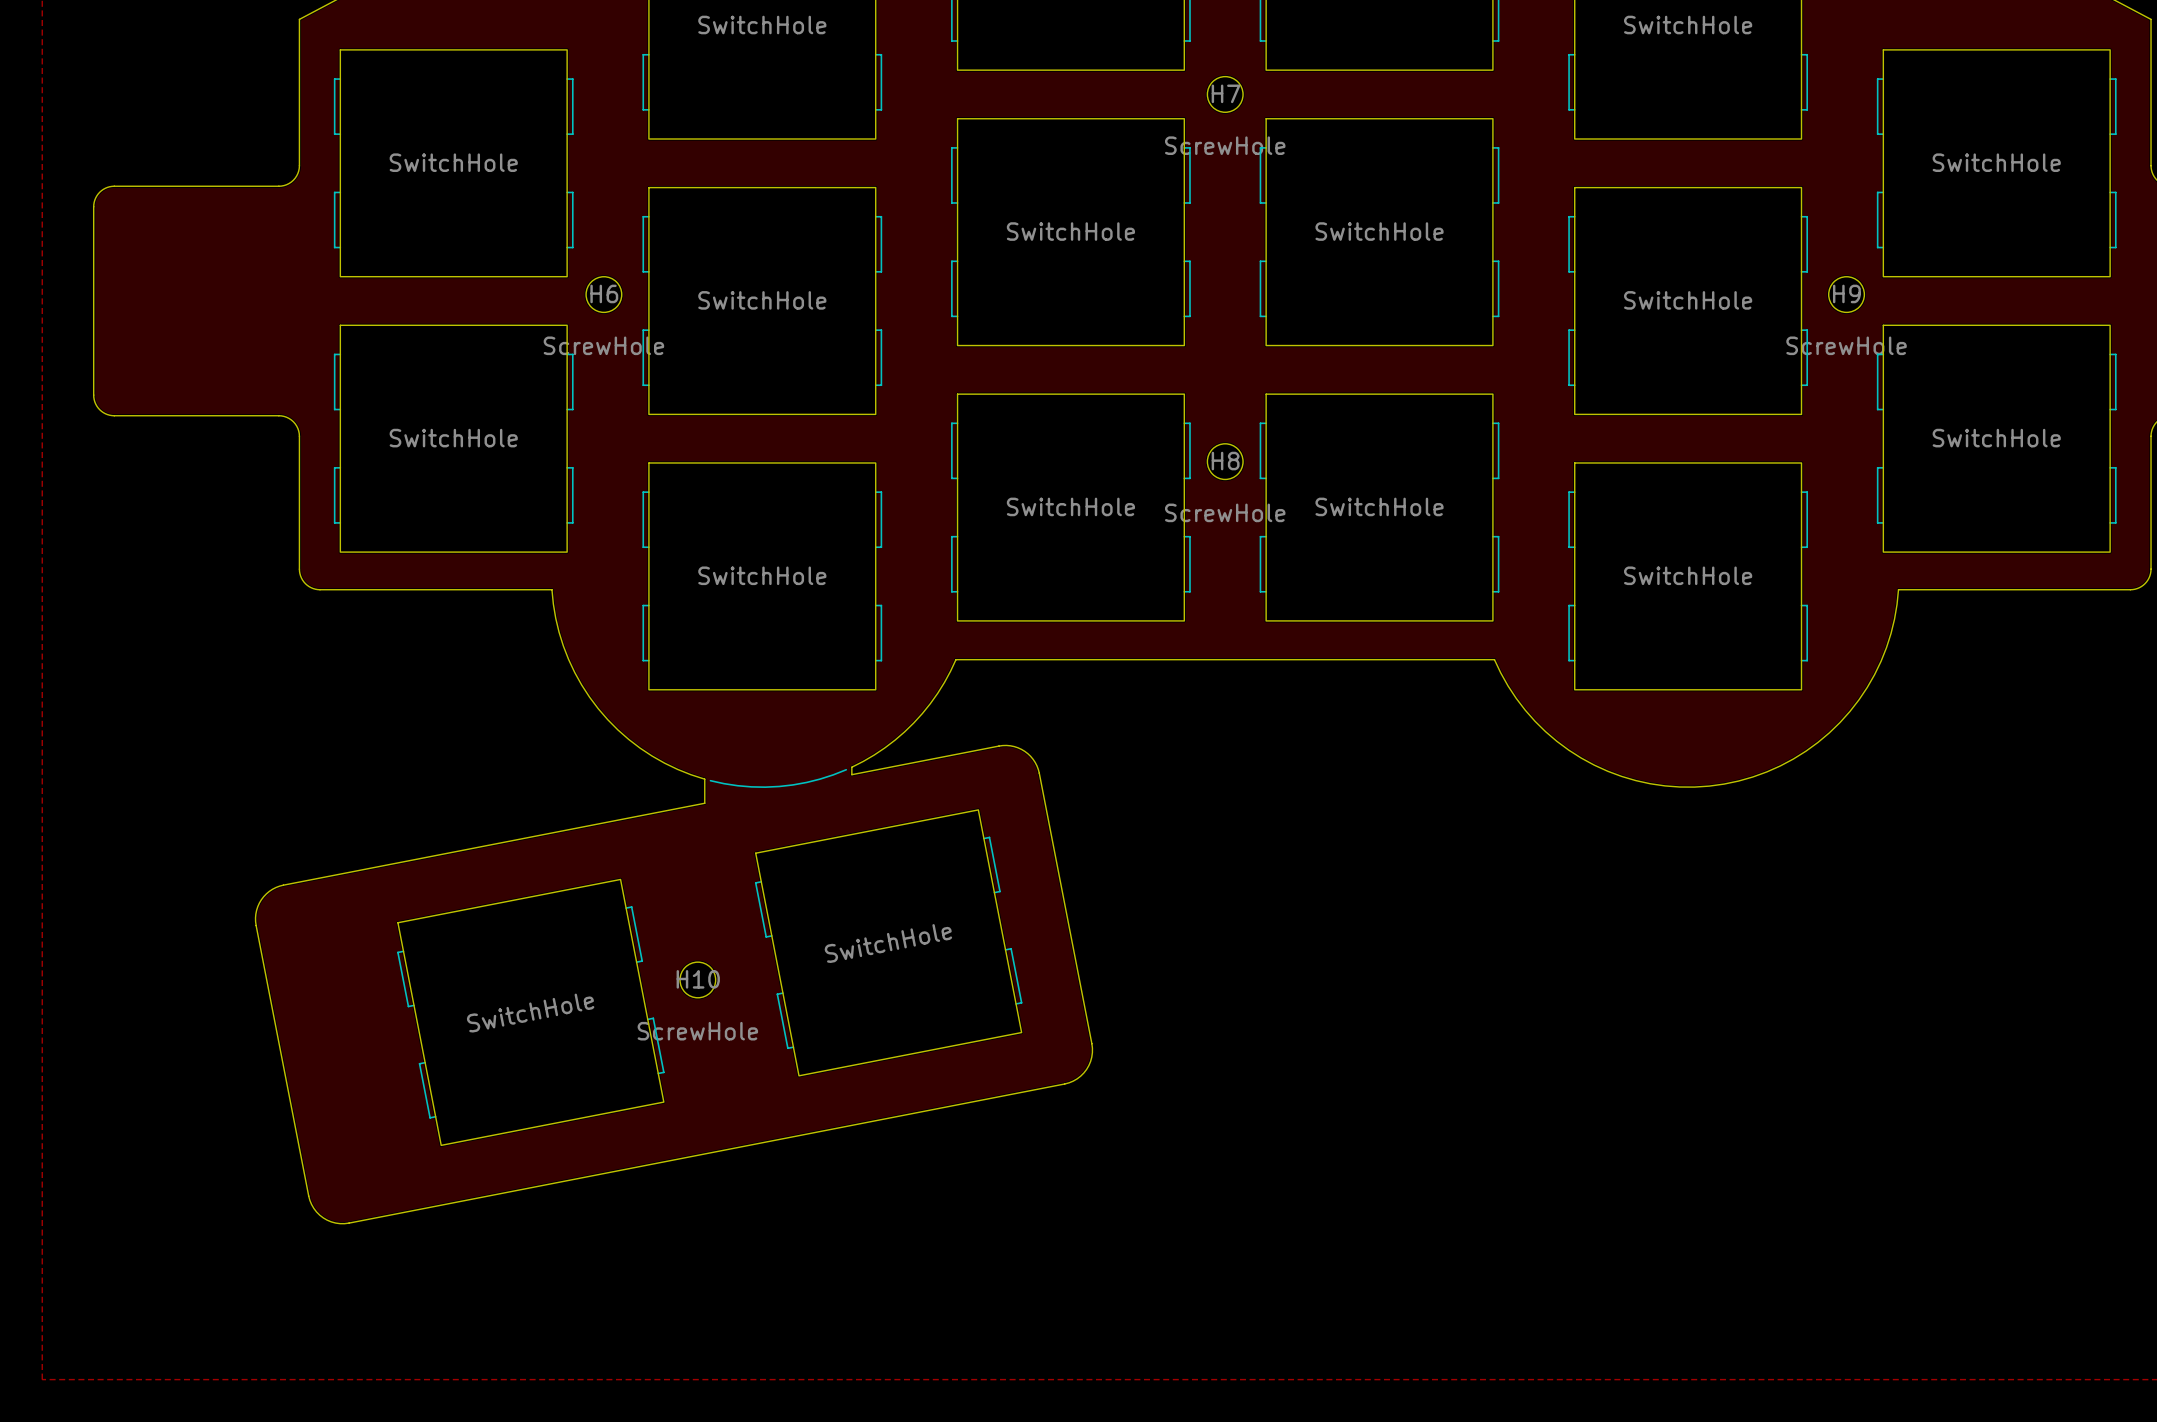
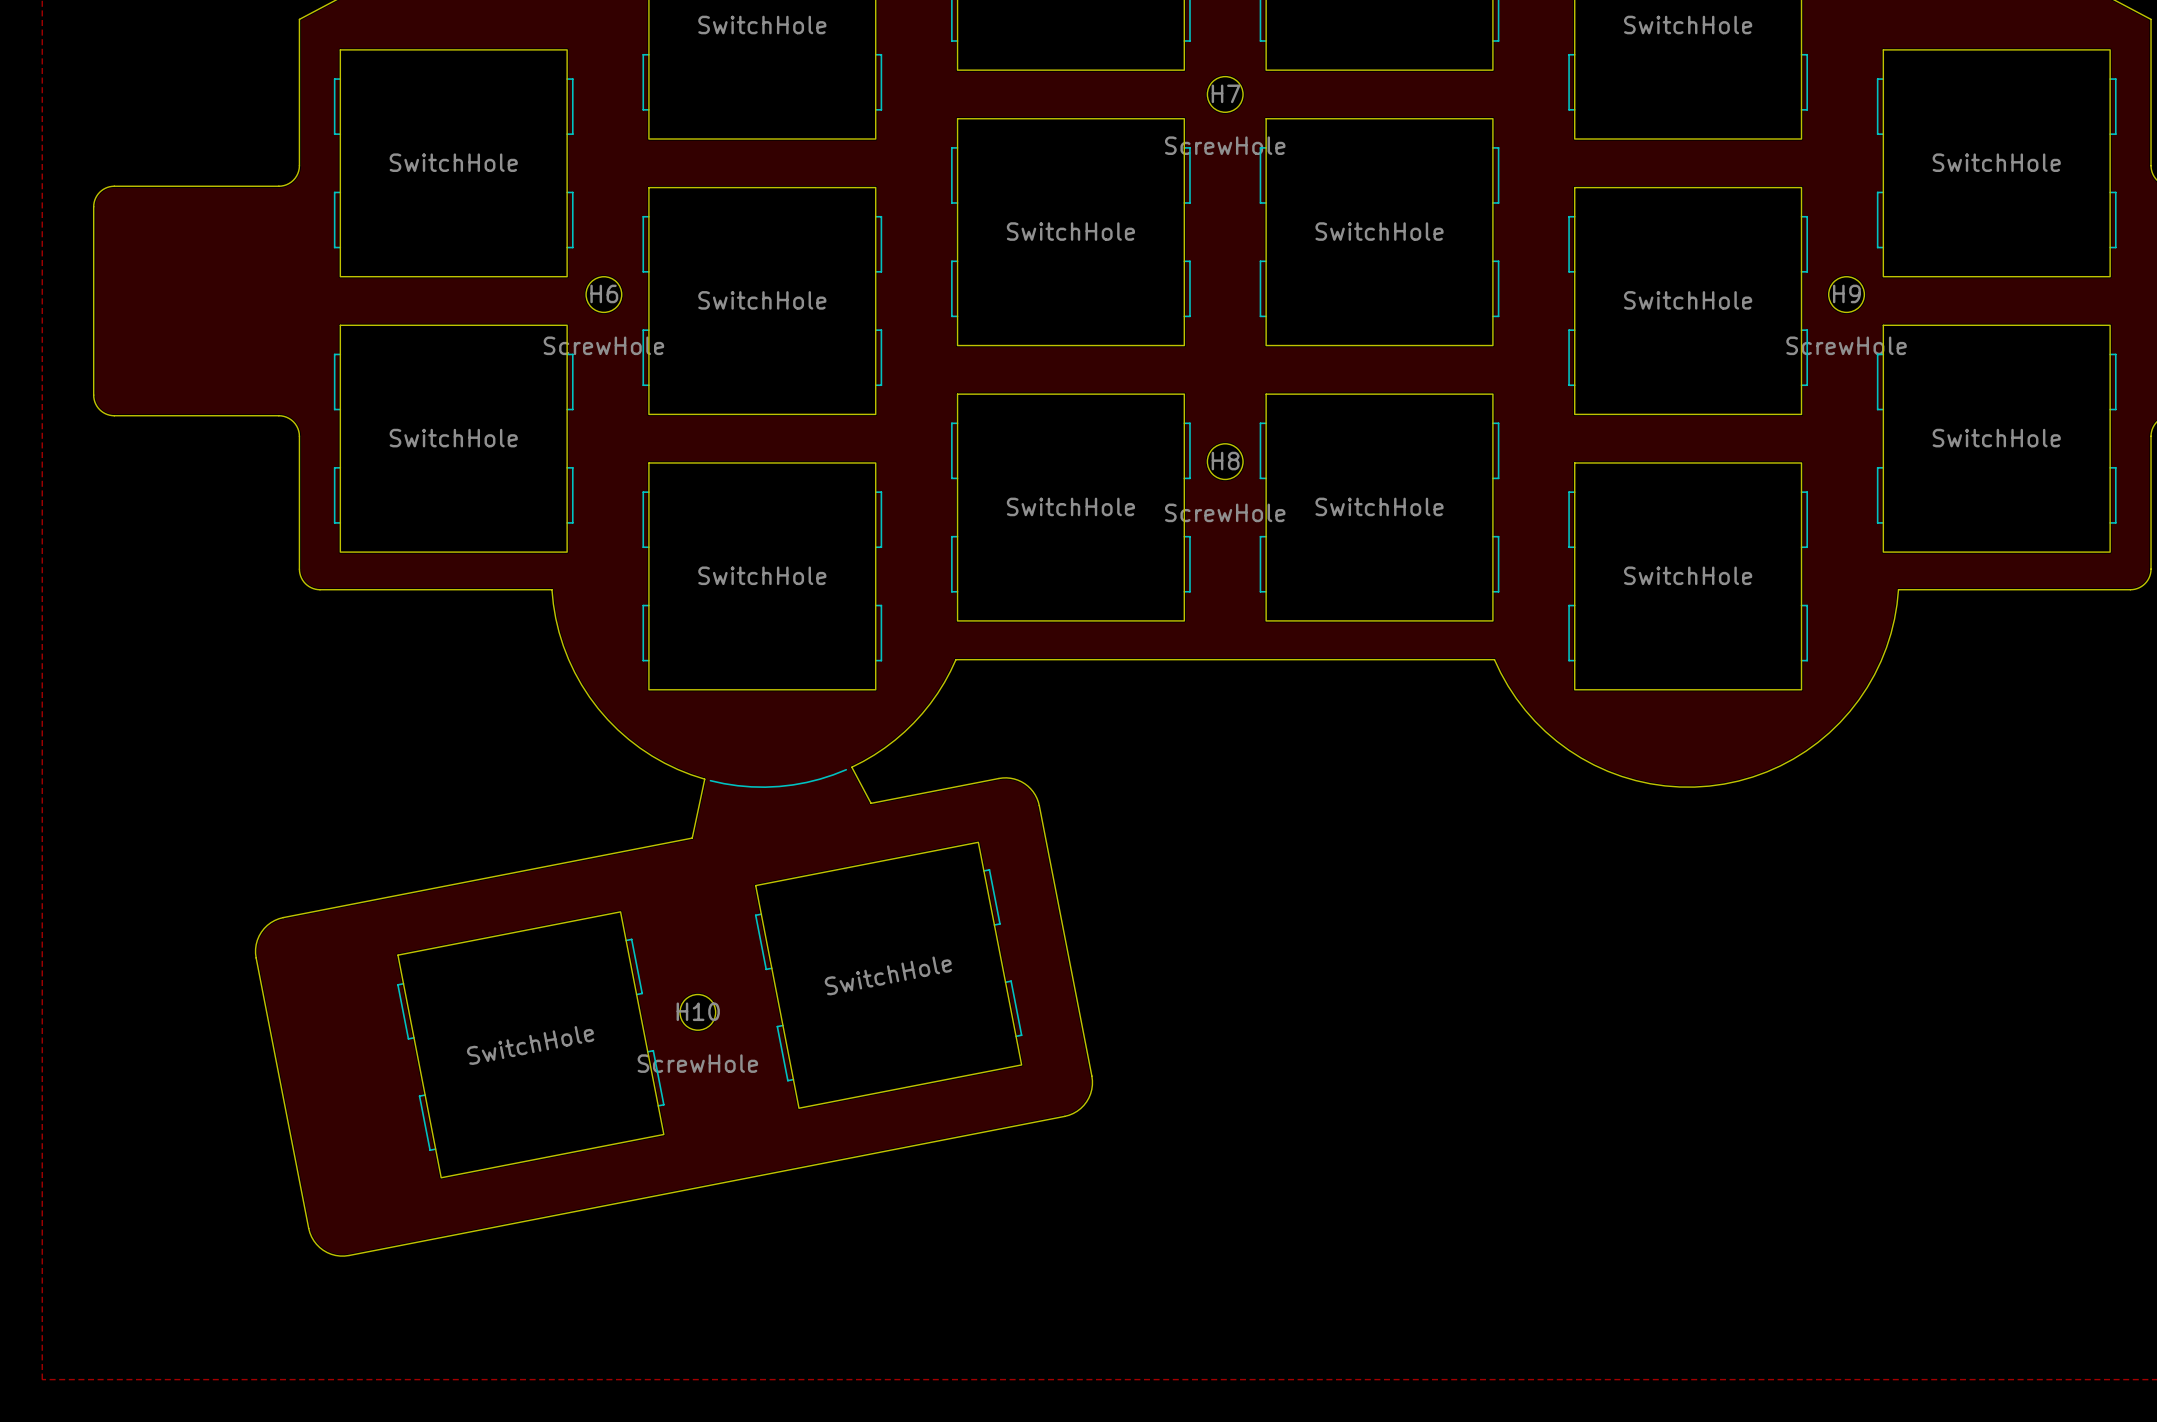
board edge: (851, 767) (851, 774) (1002, 745) (1021, 749) (1033, 759) (1039, 773) (1091, 1043) (1090, 1061) (1080, 1076) (1064, 1083) (349, 1223) (331, 1221) (319, 1215) (313, 1208) (308, 1196) (256, 925) (256, 910) (263, 896) (272, 889) (283, 885) (704, 803) (704, 779) -> (851, 767) (871, 803) (1002, 777) (1021, 781) (1033, 791) (1039, 805) (1091, 1076) (1090, 1093) (1080, 1108) (1064, 1116) (349, 1255) (335, 1255) (319, 1247) (313, 1240) (308, 1228) (256, 957) (257, 940) (264, 928) (270, 922) (283, 917) (692, 838) (704, 779)
drawing position: (888, 942) -> (888, 975)
H10 position: (697, 979) -> (697, 1012)
drawing position: (530, 1012) -> (530, 1044)

